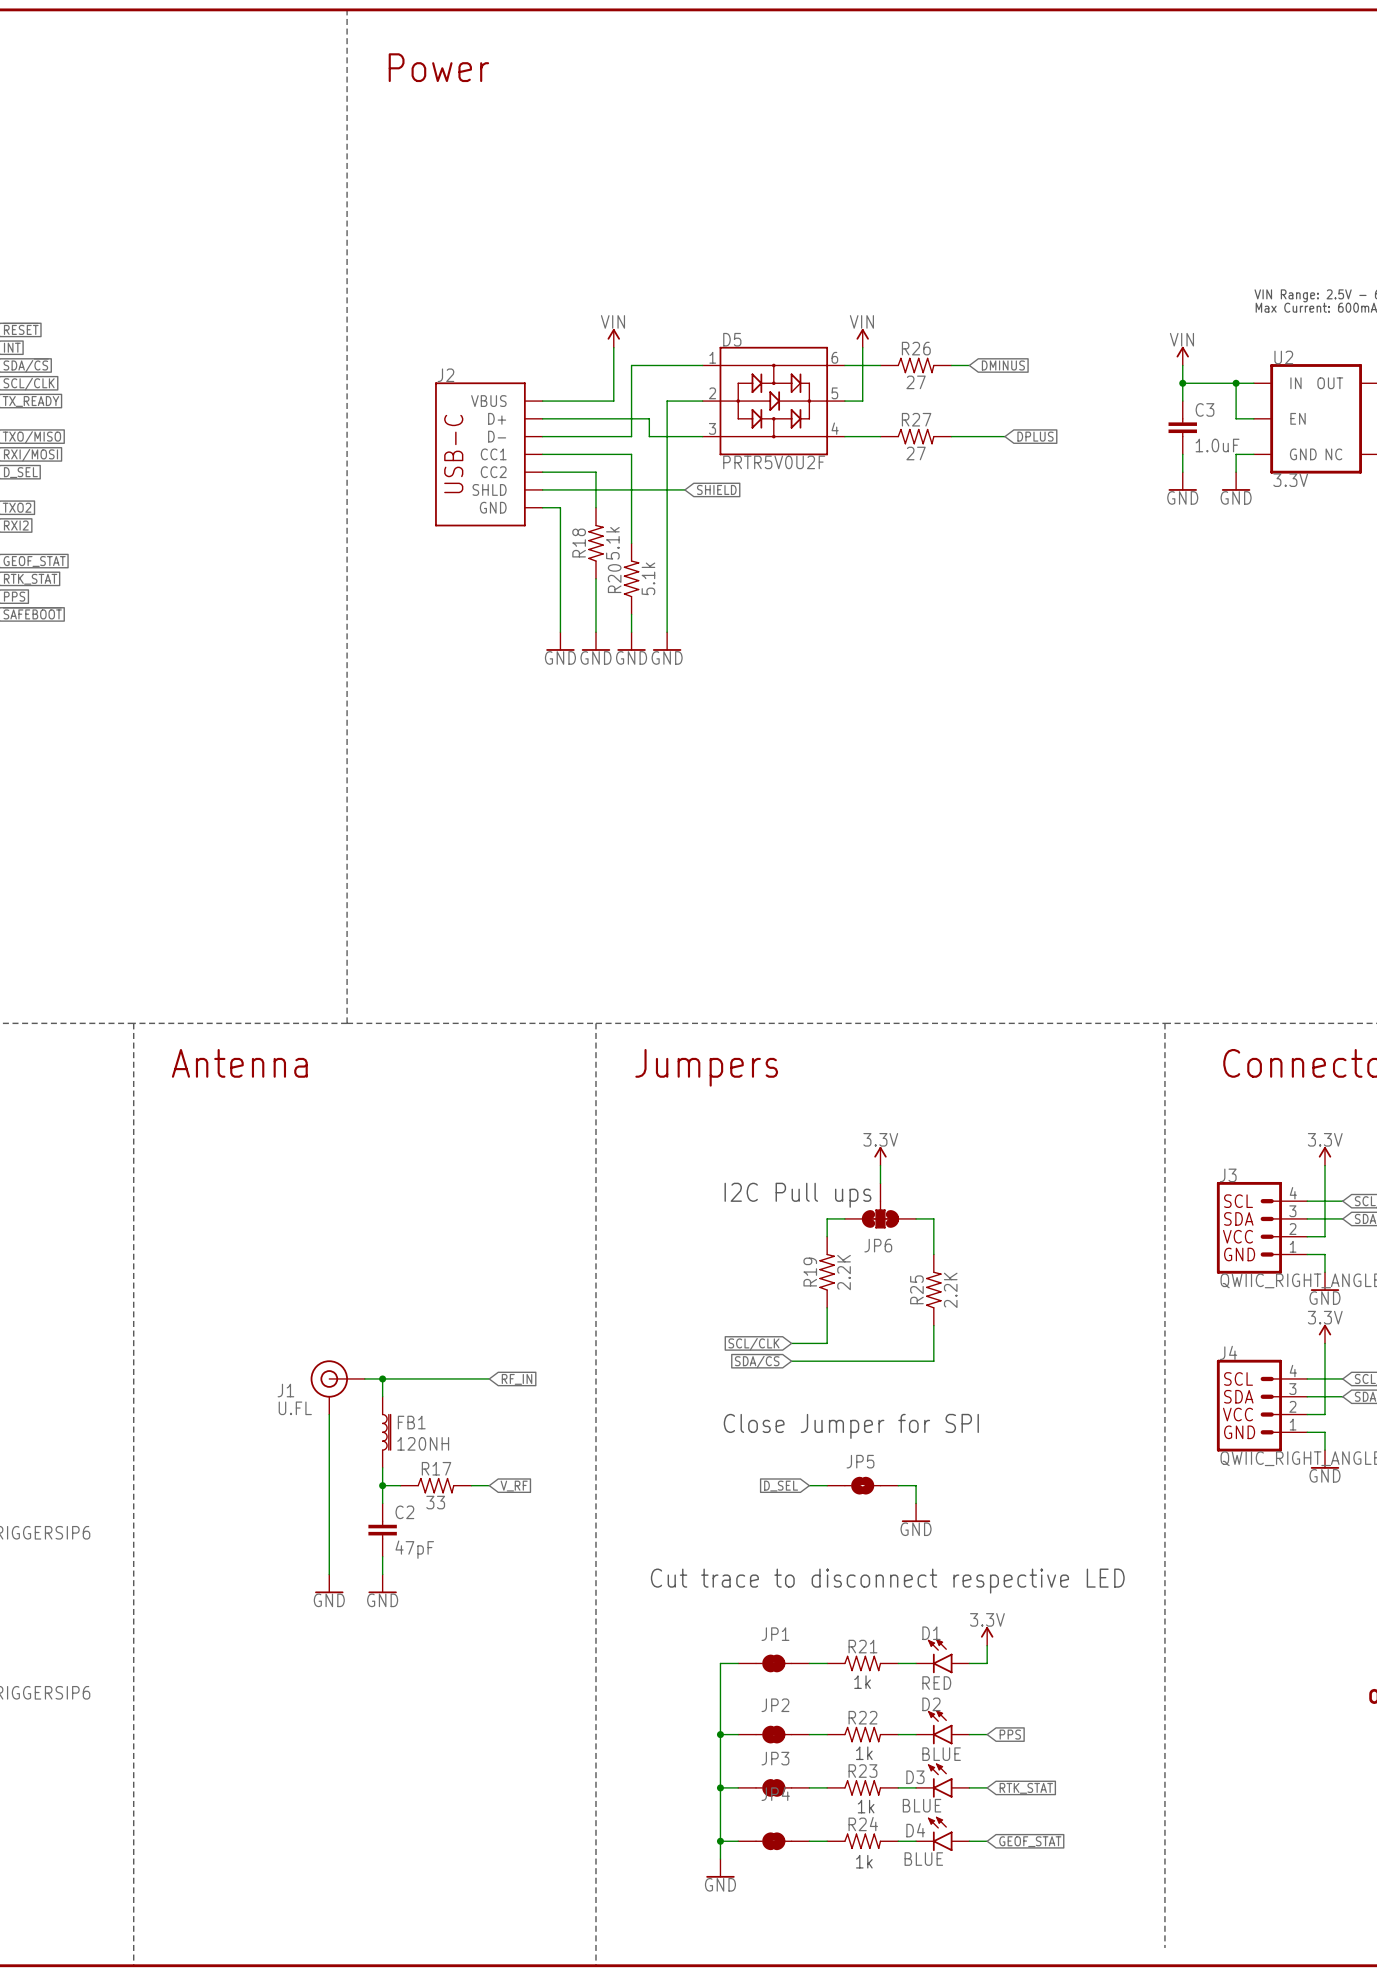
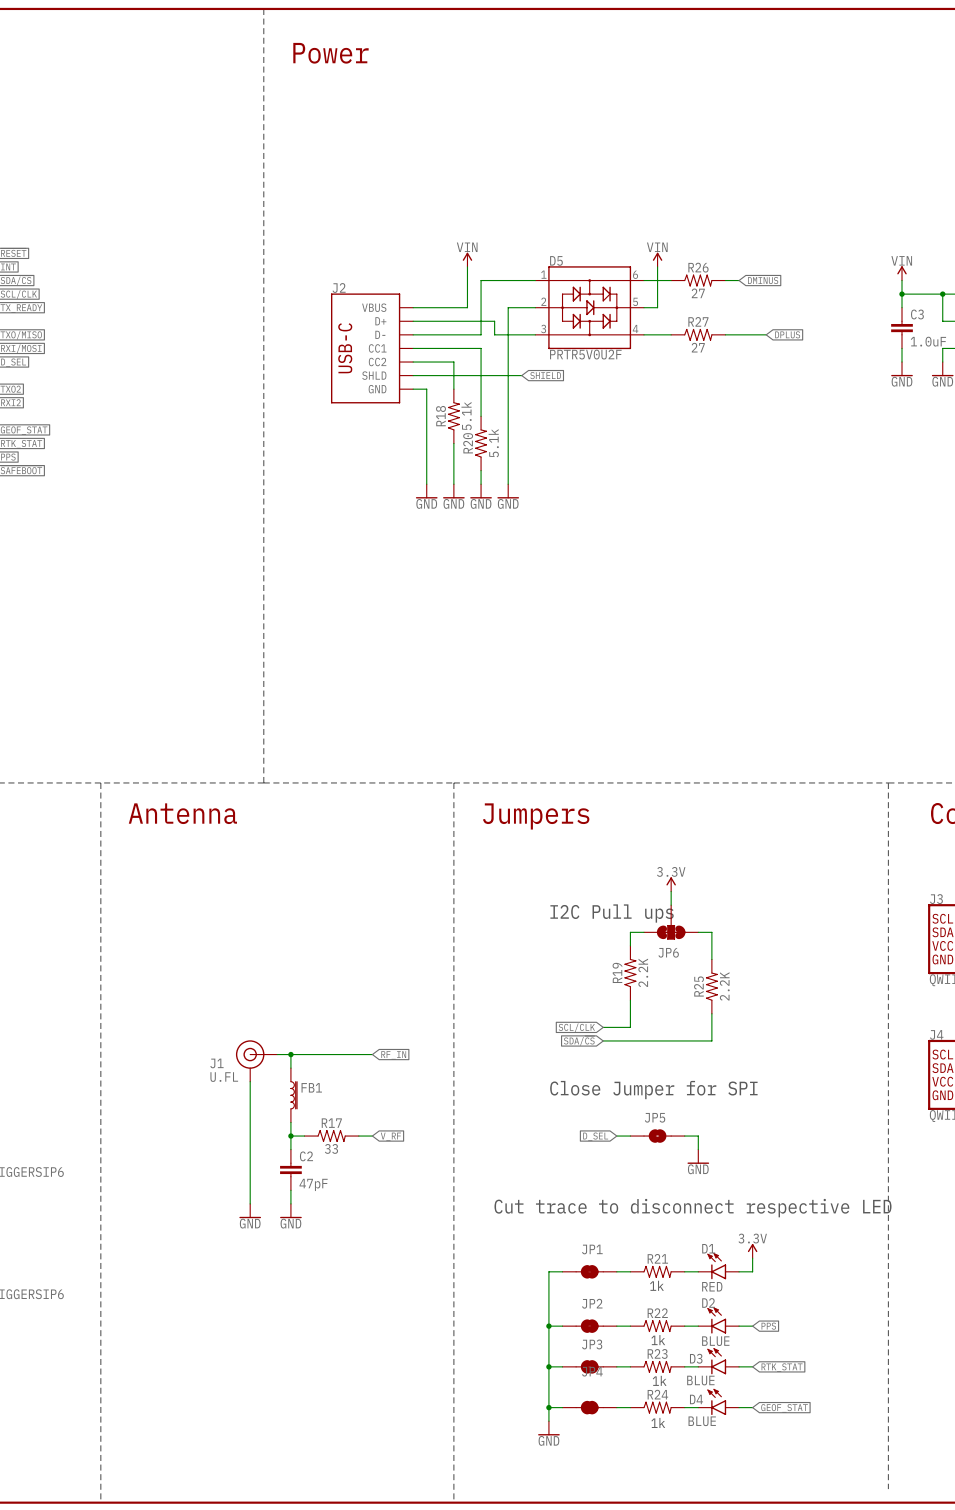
FB1 value: 120NH (423, 1443) -> none

